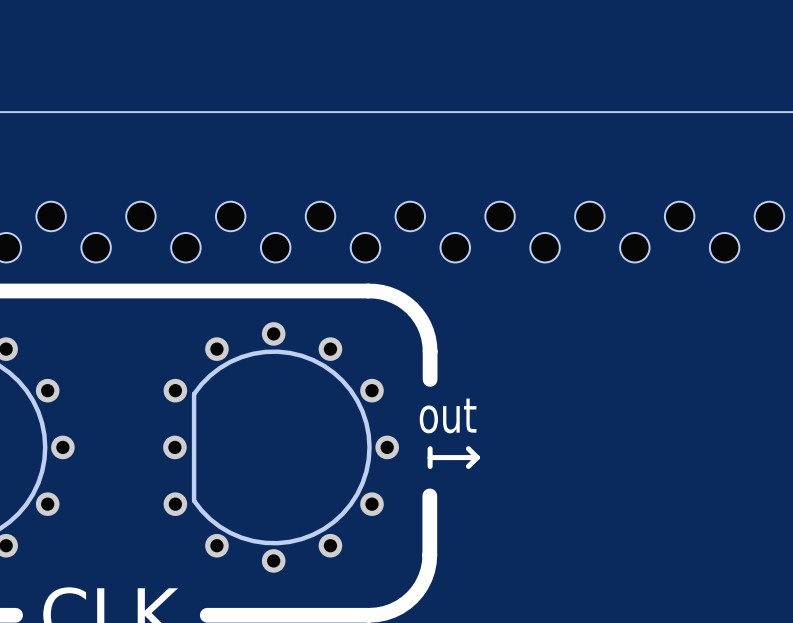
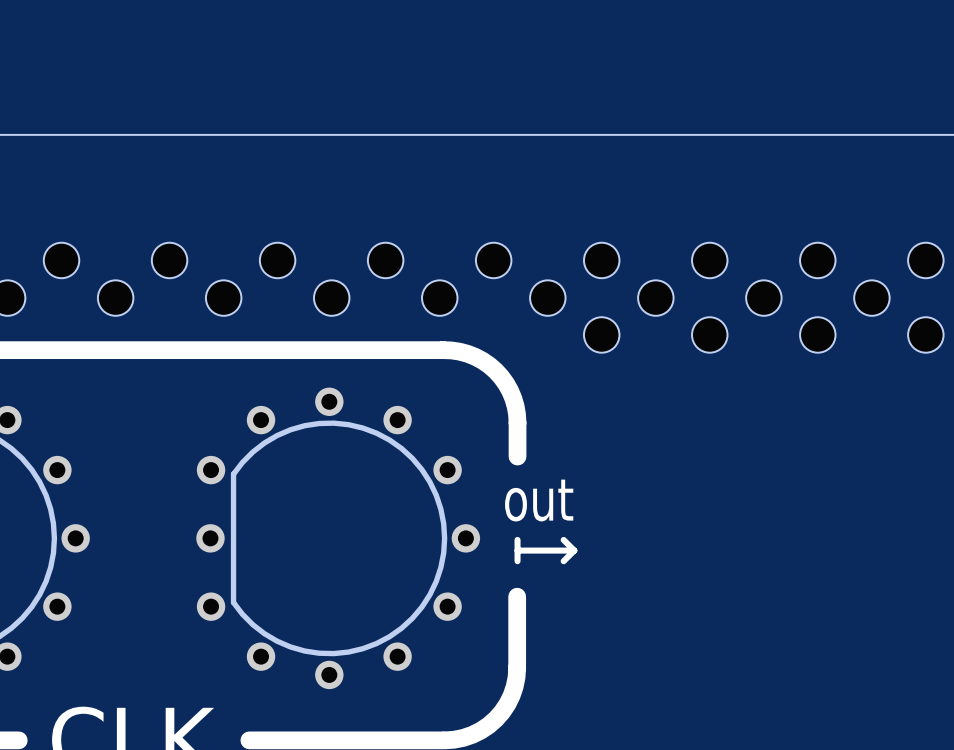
part: none -> (601, 334)
part: none -> (709, 334)
part: none -> (817, 334)
part: none -> (925, 334)

